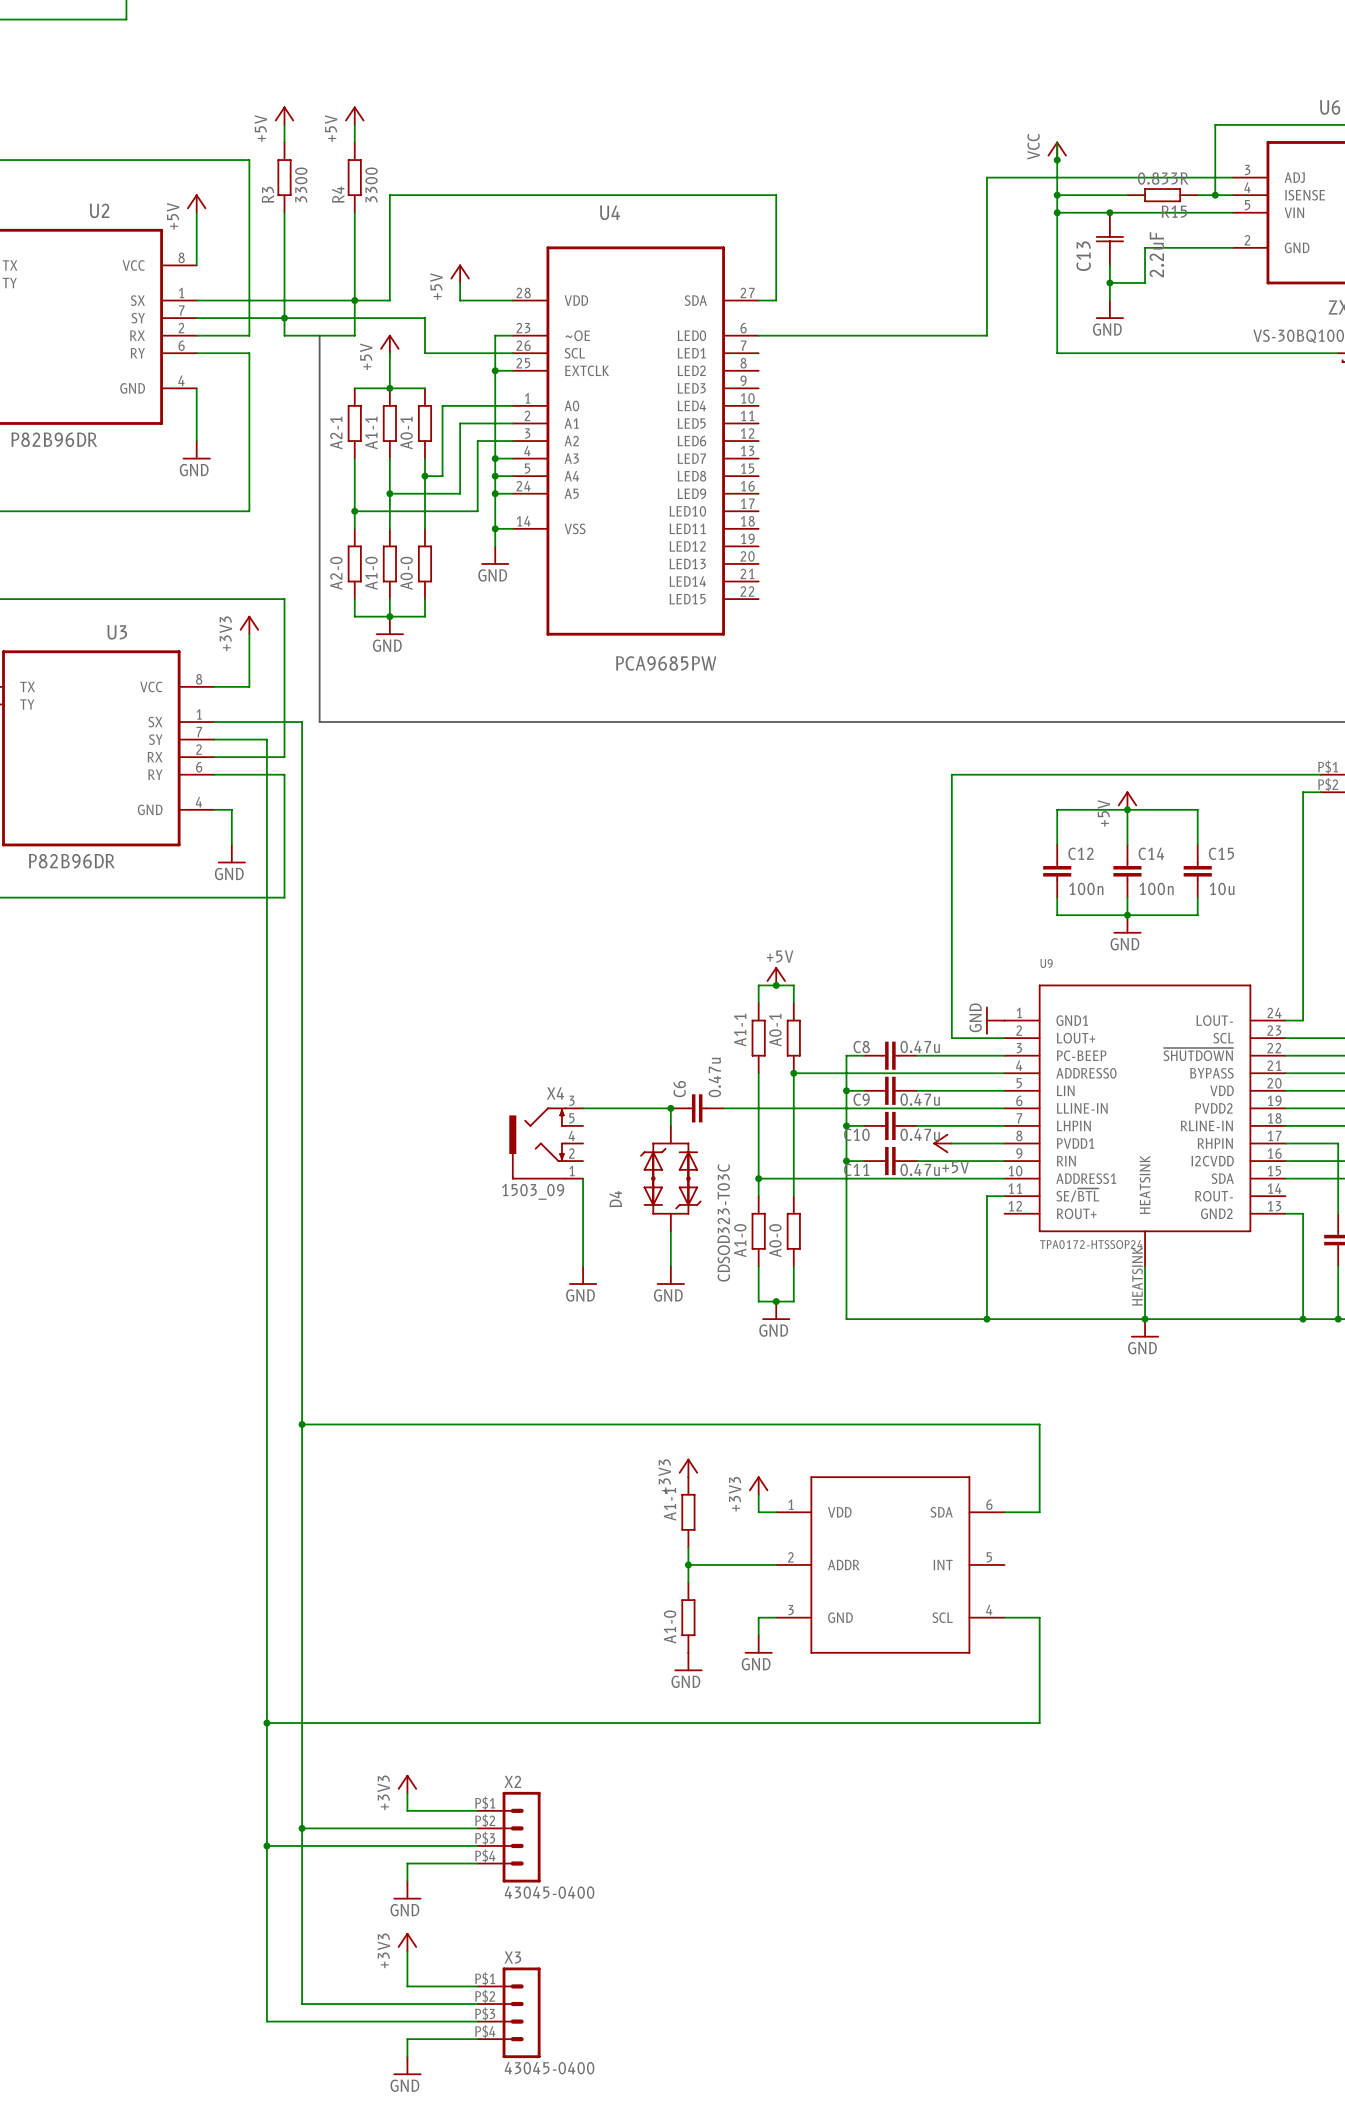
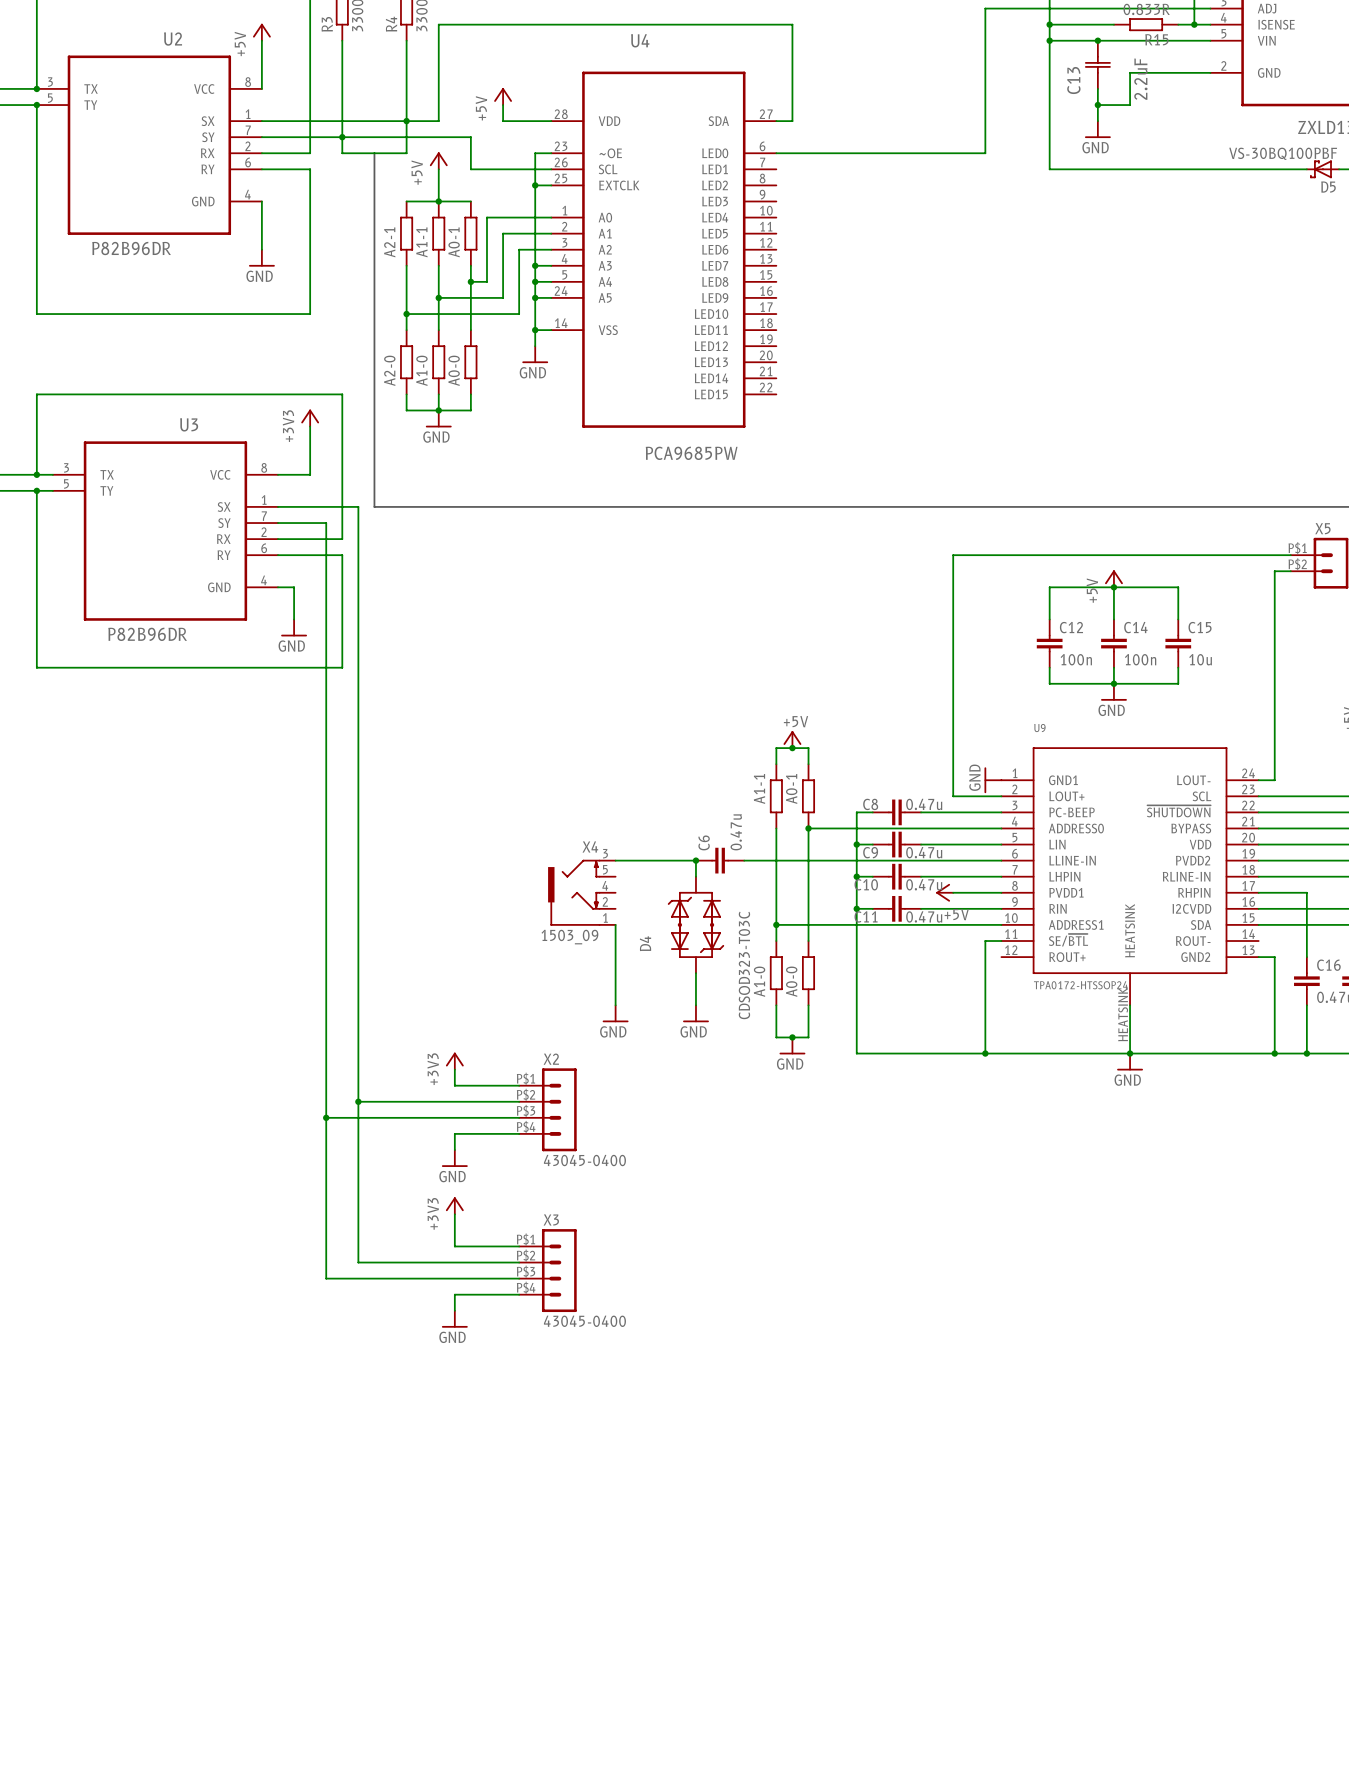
power symbol: none -> +3V3 (454, 1061)
wire: none -> (454, 1069) (454, 1085) (519, 1085)
wire: none -> (358, 1101) (519, 1101)
junction: none -> (358, 1101)
wire: none -> (326, 1117) (519, 1117)
junction: none -> (326, 1117)
wire: none -> (519, 1133) (454, 1133) (454, 1150)
wire: (302, 1424) (1039, 1424) (1039, 1512) (1004, 1512) -> none
junction: (302, 1424) -> none
power symbol: none -> GND (454, 1158)
power symbol: +3V3 (688, 1467) -> none
power symbol: none -> +3V3 (454, 1205)
power symbol: +3V3 (758, 1485) -> none
wire: none -> (454, 1214) (454, 1246) (519, 1246)
wire: (758, 1494) (758, 1512) (776, 1512) -> none
part: A1-1 (688, 1512) -> none
wire: (302, 1547) (302, 2004) (477, 2004) -> (358, 1262) (519, 1262)
wire: (688, 1547) (688, 1582) -> none
wire: (266, 1564) (266, 2021) (477, 2021) -> (326, 1278) (519, 1278)
wire: (688, 1564) (776, 1564) -> none
junction: (688, 1564) -> none
part: (890, 1564) -> none
wire: none -> (519, 1294) (454, 1294) (454, 1310)
power symbol: none -> GND (454, 1319)
part: A1-0 (688, 1617) -> none
wire: (776, 1617) (758, 1617) (758, 1635) -> none
wire: (1004, 1617) (1039, 1617) (1039, 1723) (266, 1723) -> none
power symbol: GND (758, 1644) -> none
power symbol: GND (688, 1662) -> none
junction: (266, 1723) -> none
power symbol: +3V3 (407, 1784) -> none
wire: (407, 1793) (407, 1810) (477, 1810) -> none
wire: (302, 1828) (477, 1828) -> none
junction: (302, 1828) -> none
X2 position: (509, 1837) -> (547, 1109)
wire: (266, 1845) (477, 1845) -> none
junction: (266, 1845) -> none
wire: (477, 1863) (407, 1863) (407, 1881) -> none
power symbol: GND (407, 1890) -> none
power symbol: +3V3 (407, 1942) -> none
wire: (407, 1951) (407, 1986) (477, 1986) -> none
X3 position: (509, 2012) -> (547, 1270)
wire: (477, 2039) (407, 2039) (407, 2056) -> none
power symbol: GND (407, 2065) -> none

